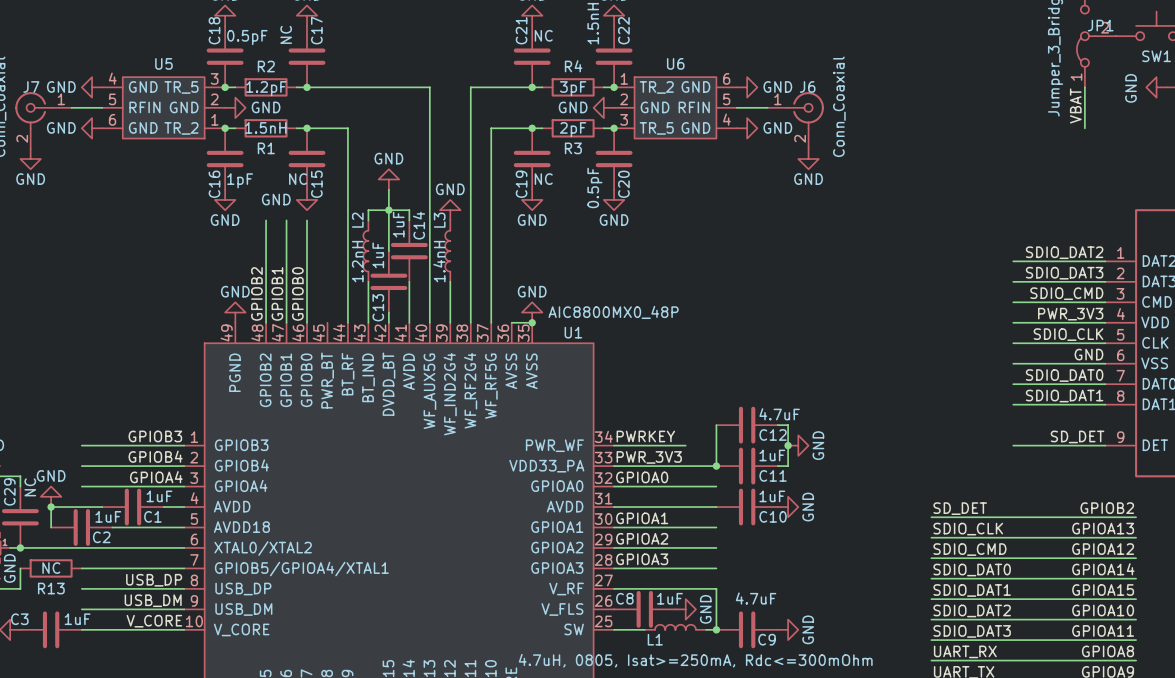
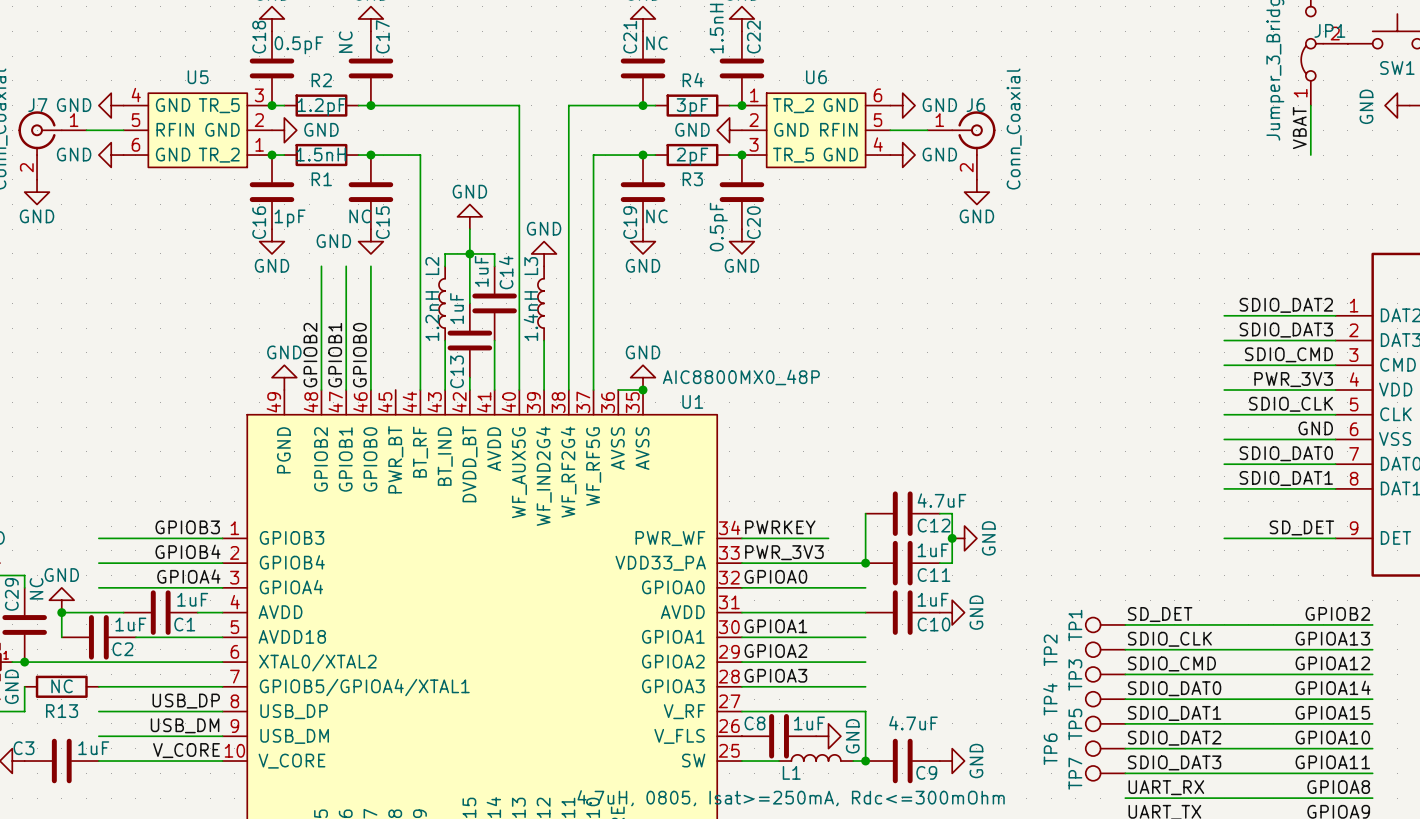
TP1: none -> (1105, 624)
TP2: none -> (1105, 649)
TP3: none -> (1105, 674)
TP4: none -> (1105, 699)
TP5: none -> (1105, 723)
TP6: none -> (1105, 748)
TP7: none -> (1105, 773)
L1 value position: 4.7uH, 0805, Isat>=250mA, Rdc<=300mOhm (695, 660) -> 4.7uH, 0805, Isat>=250mA, Rdc<=300mOhm (791, 798)

